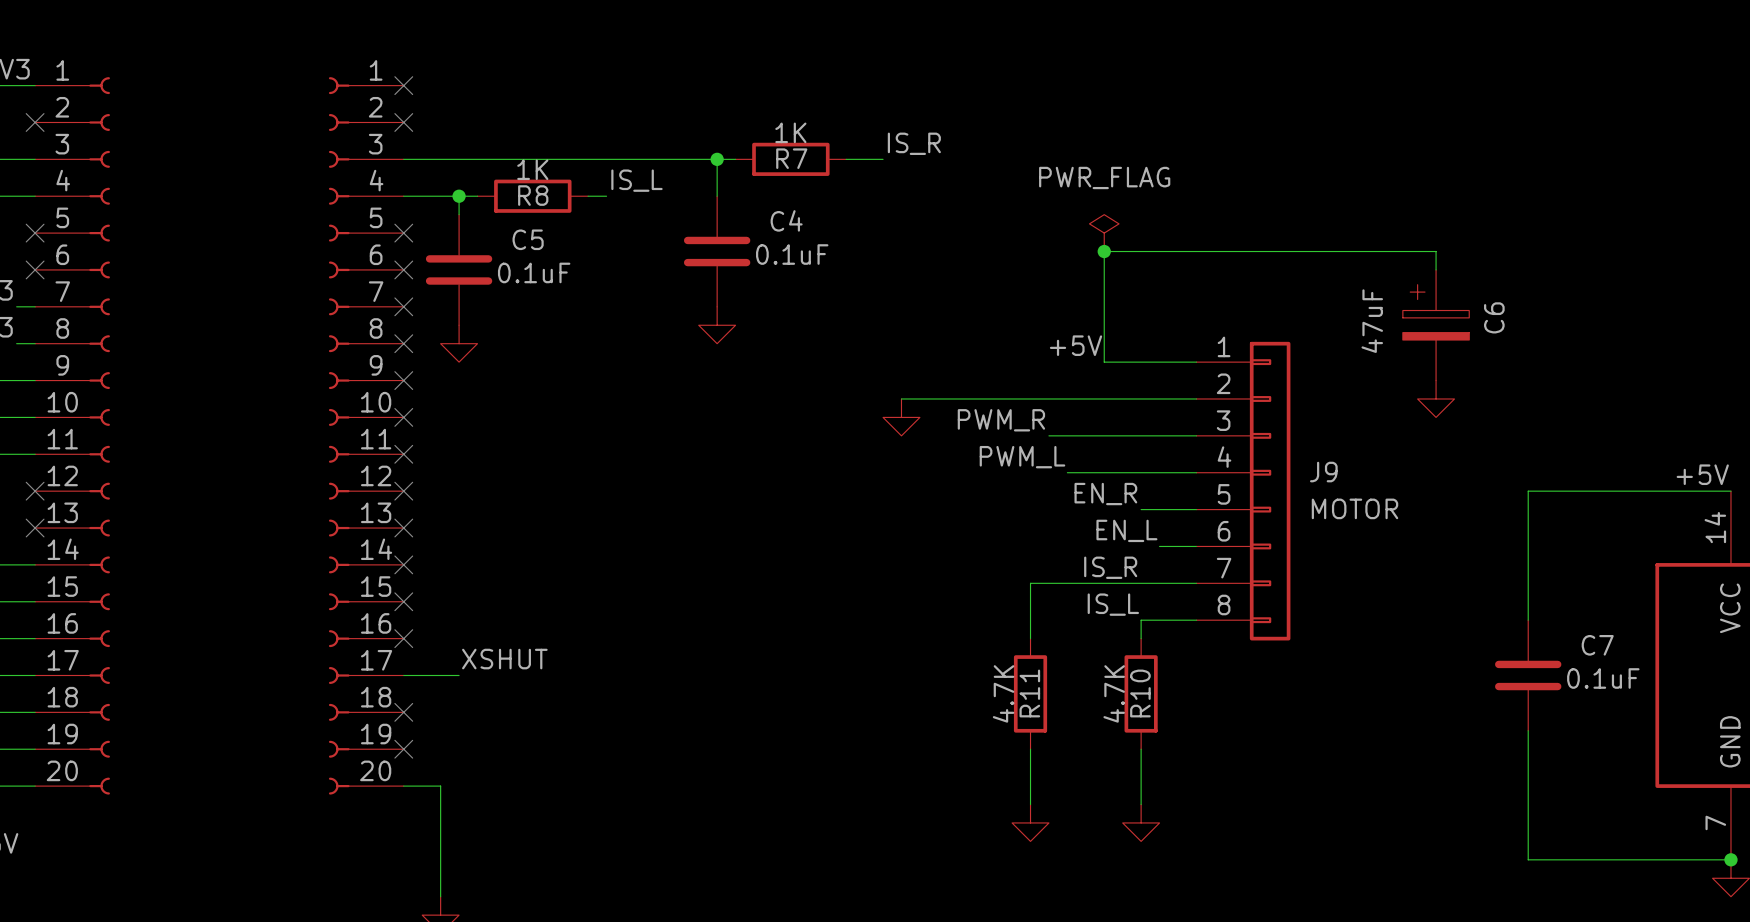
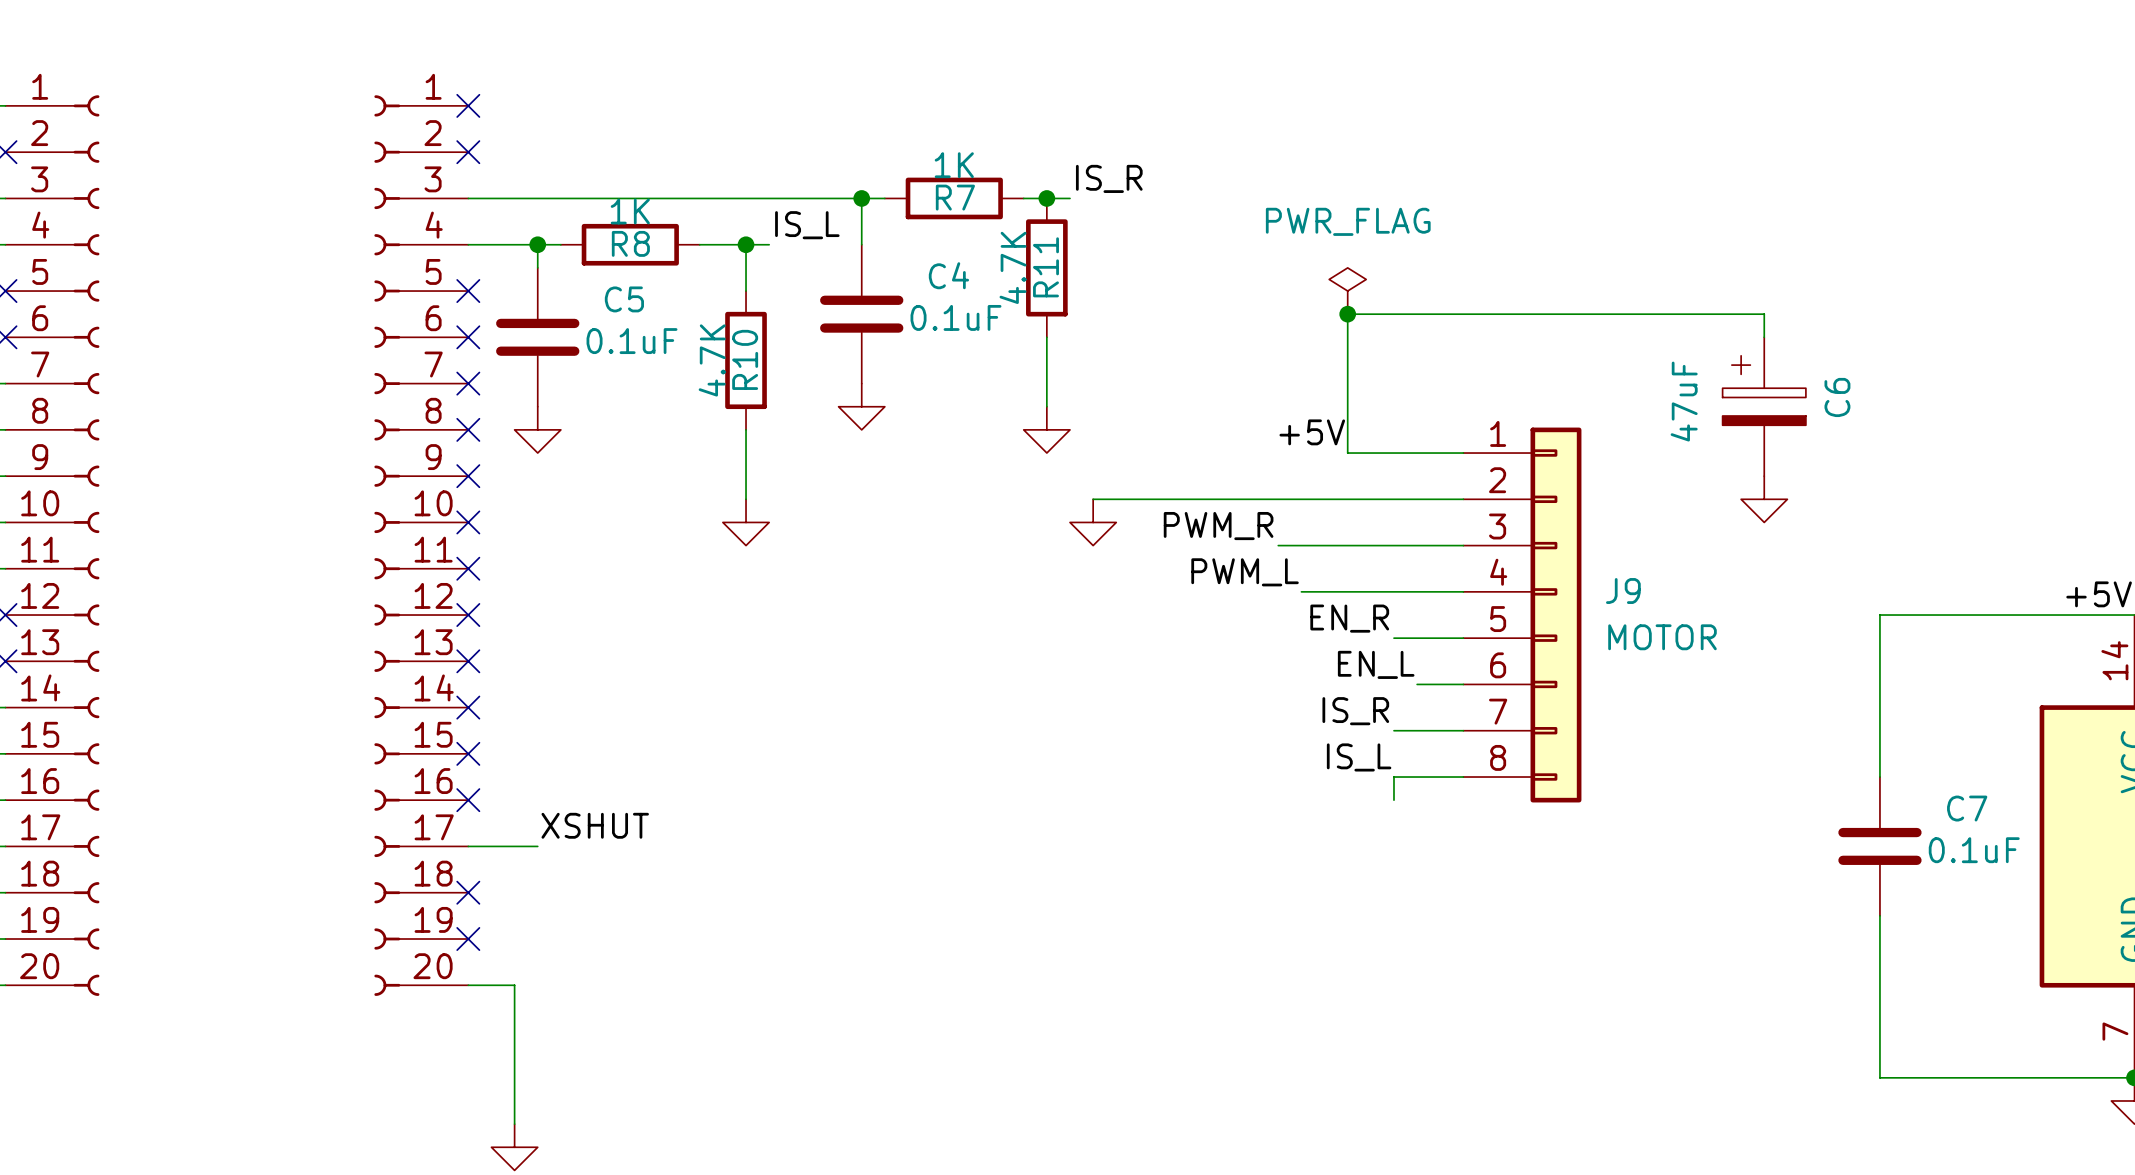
junction: none -> (1046, 198)
label position: IS_L (636, 180) -> IS_L (807, 225)
wire: none -> (722, 244) (769, 244)
wire: none -> (746, 244) (746, 291)
junction: none -> (746, 244)
wire: none -> (1046, 337) (1046, 406)
wire: none -> (746, 429) (746, 499)
power symbol: none -> (1046, 429)
power symbol: none -> (746, 522)
wire: (1141, 583) (1030, 583) (1030, 638) -> none
R11 position: (1030, 693) -> (1046, 267)
R10 position: (1141, 693) -> (746, 360)
wire: (1030, 749) (1030, 804) -> none
wire: (1141, 749) (1141, 804) -> none
power symbol: (1030, 822) -> none
power symbol: (1141, 822) -> none

